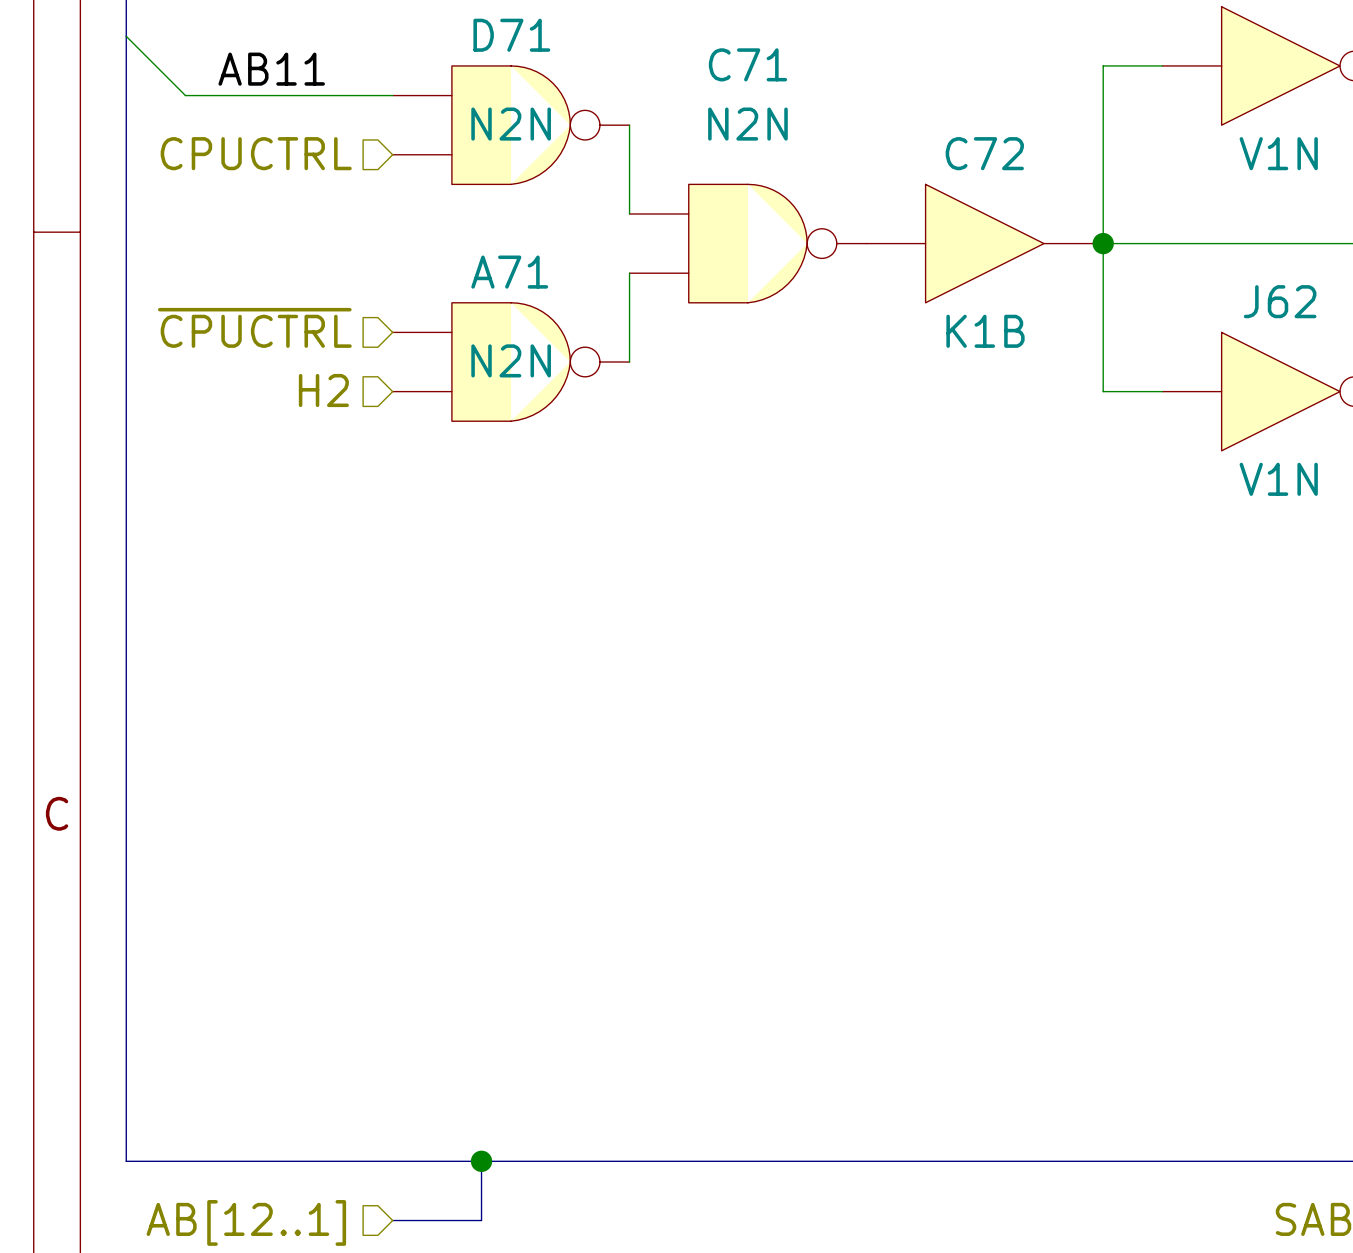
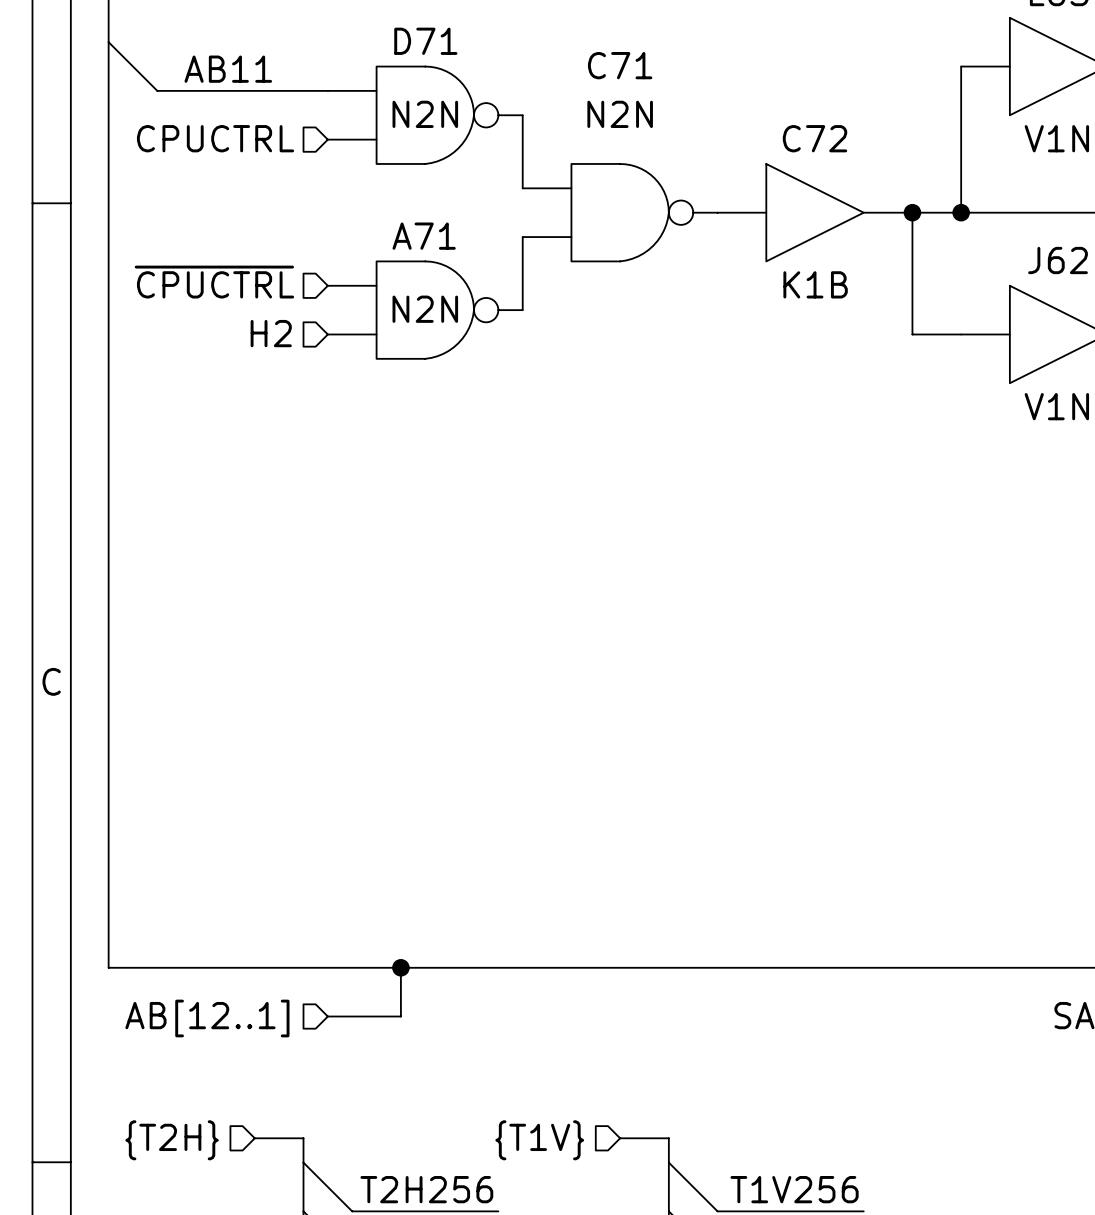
wire: (1162, 65) (1103, 65) (1103, 243) -> (961, 66) (961, 212)
junction: none -> (961, 212)

